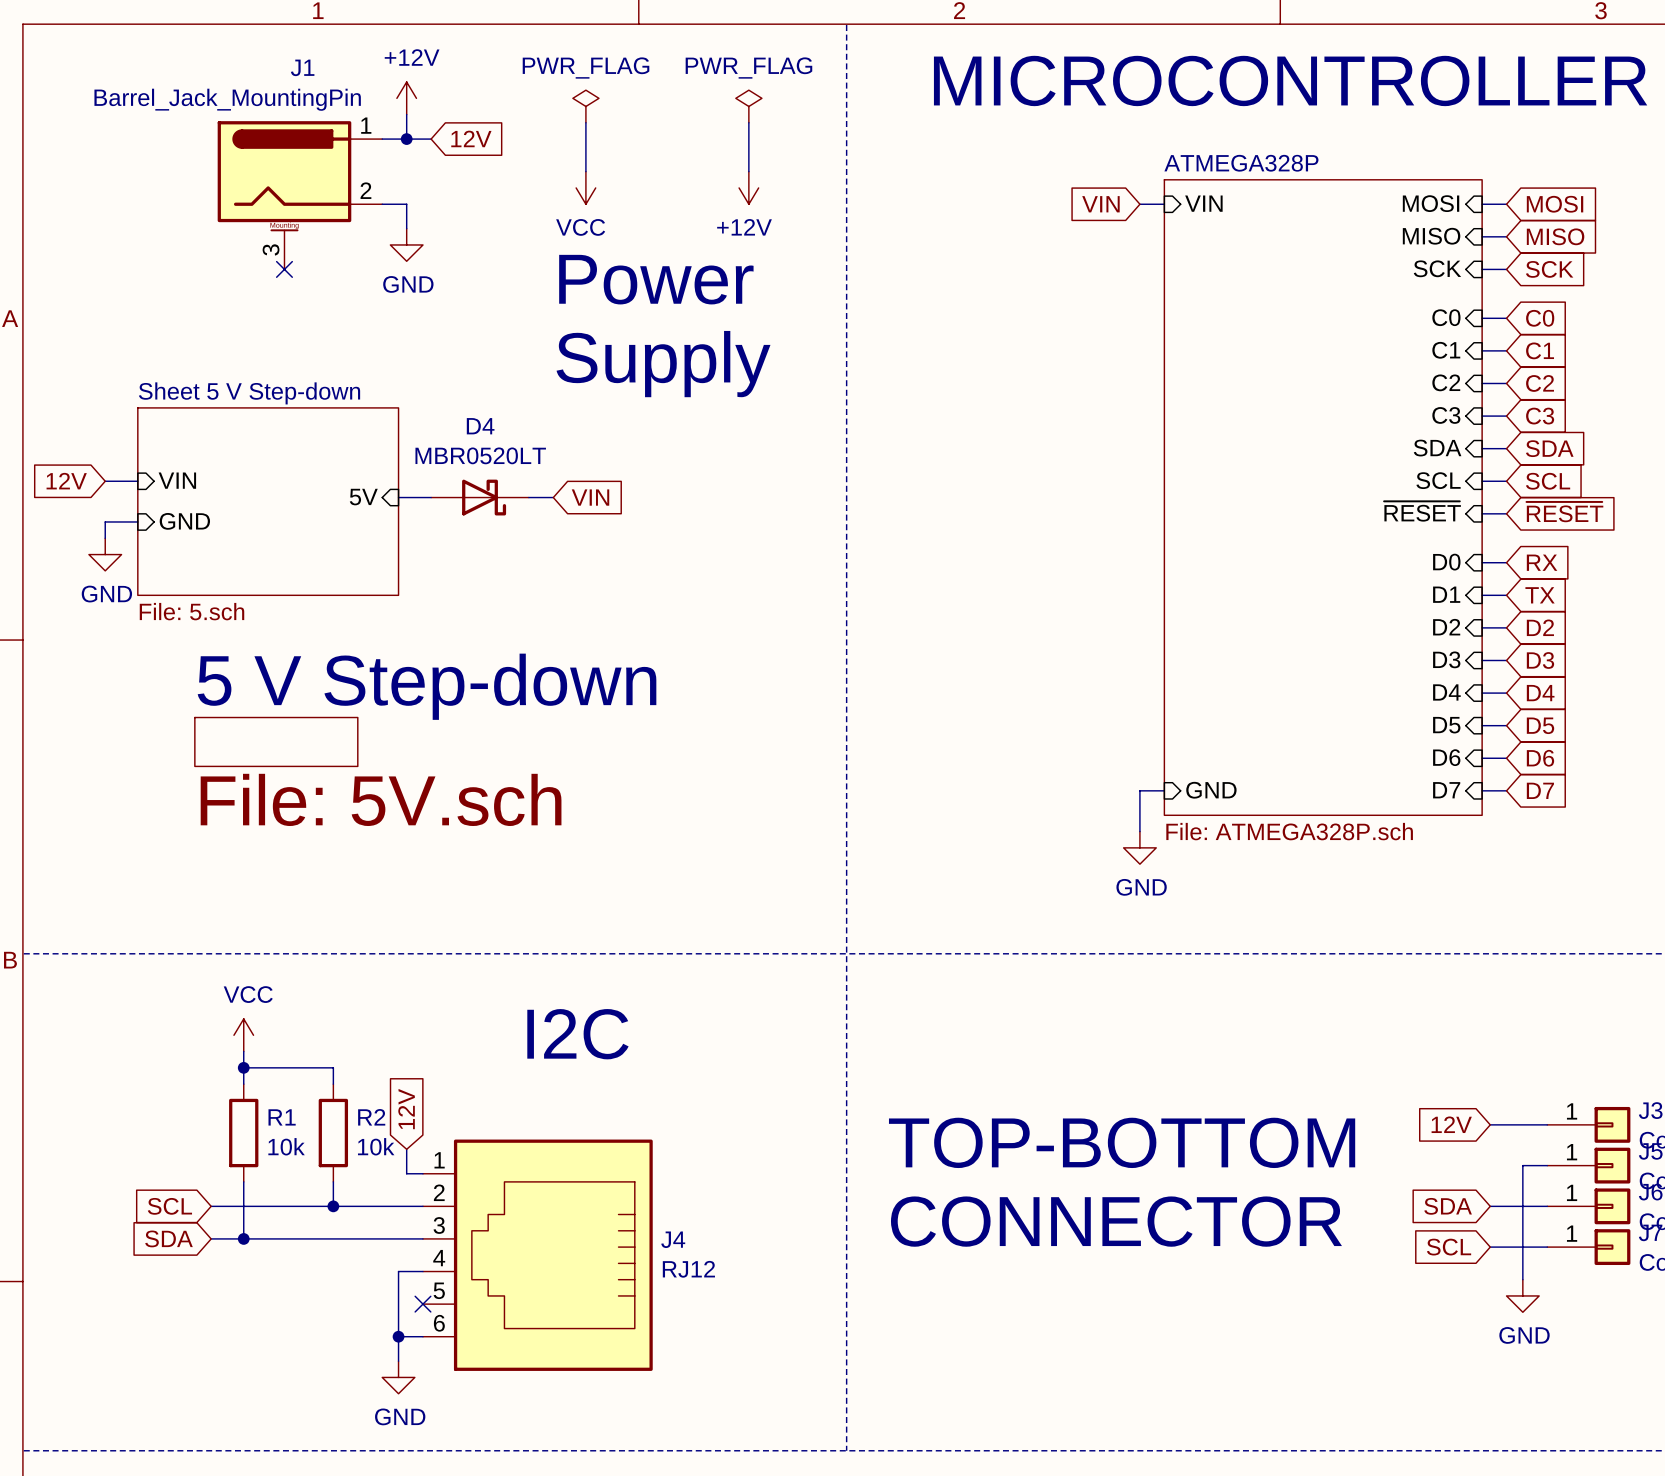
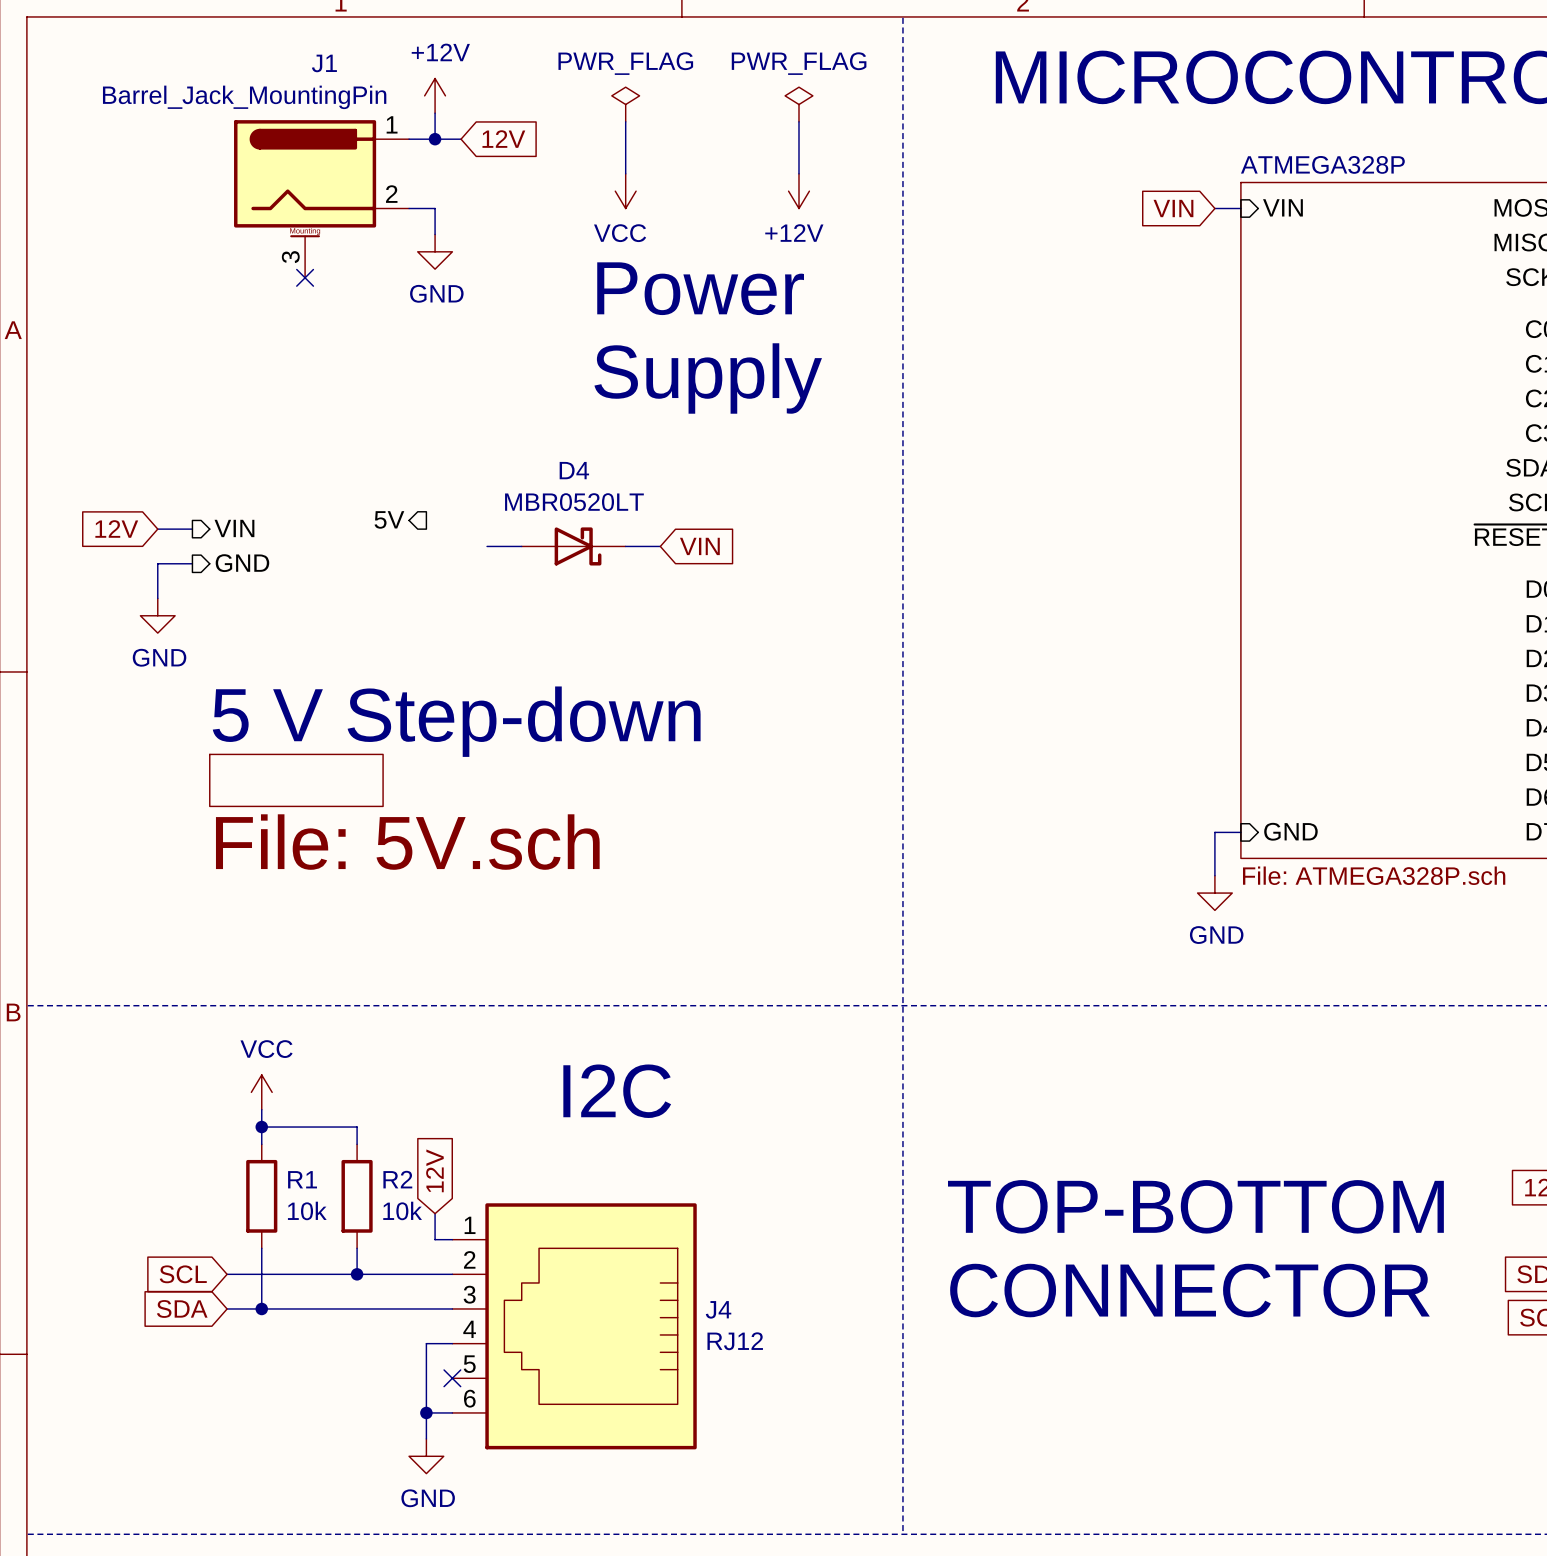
sheet pin position: VIN (177, 480) -> VIN (234, 528)
global label position: 12V (66, 481) -> 12V (116, 528)
wire: (105, 481) (137, 481) -> (157, 529) (192, 529)
wire: (398, 497) (431, 497) -> (487, 546) (521, 546)
D4 position: (480, 497) -> (573, 546)
wire: (528, 497) (553, 497) -> none
global label position: VIN (590, 497) -> VIN (699, 546)
sheet Sheet 5 V Step-down: File: 5.sch (268, 501) -> none
wire: (137, 521) (105, 521) (105, 538) -> none
sheet pin position: GND (184, 521) -> GND (242, 563)
wire: none -> (625, 546) (660, 546)
wire: none -> (192, 563) (157, 563) (157, 598)
power symbol position: GND (105, 554) -> GND (157, 615)

